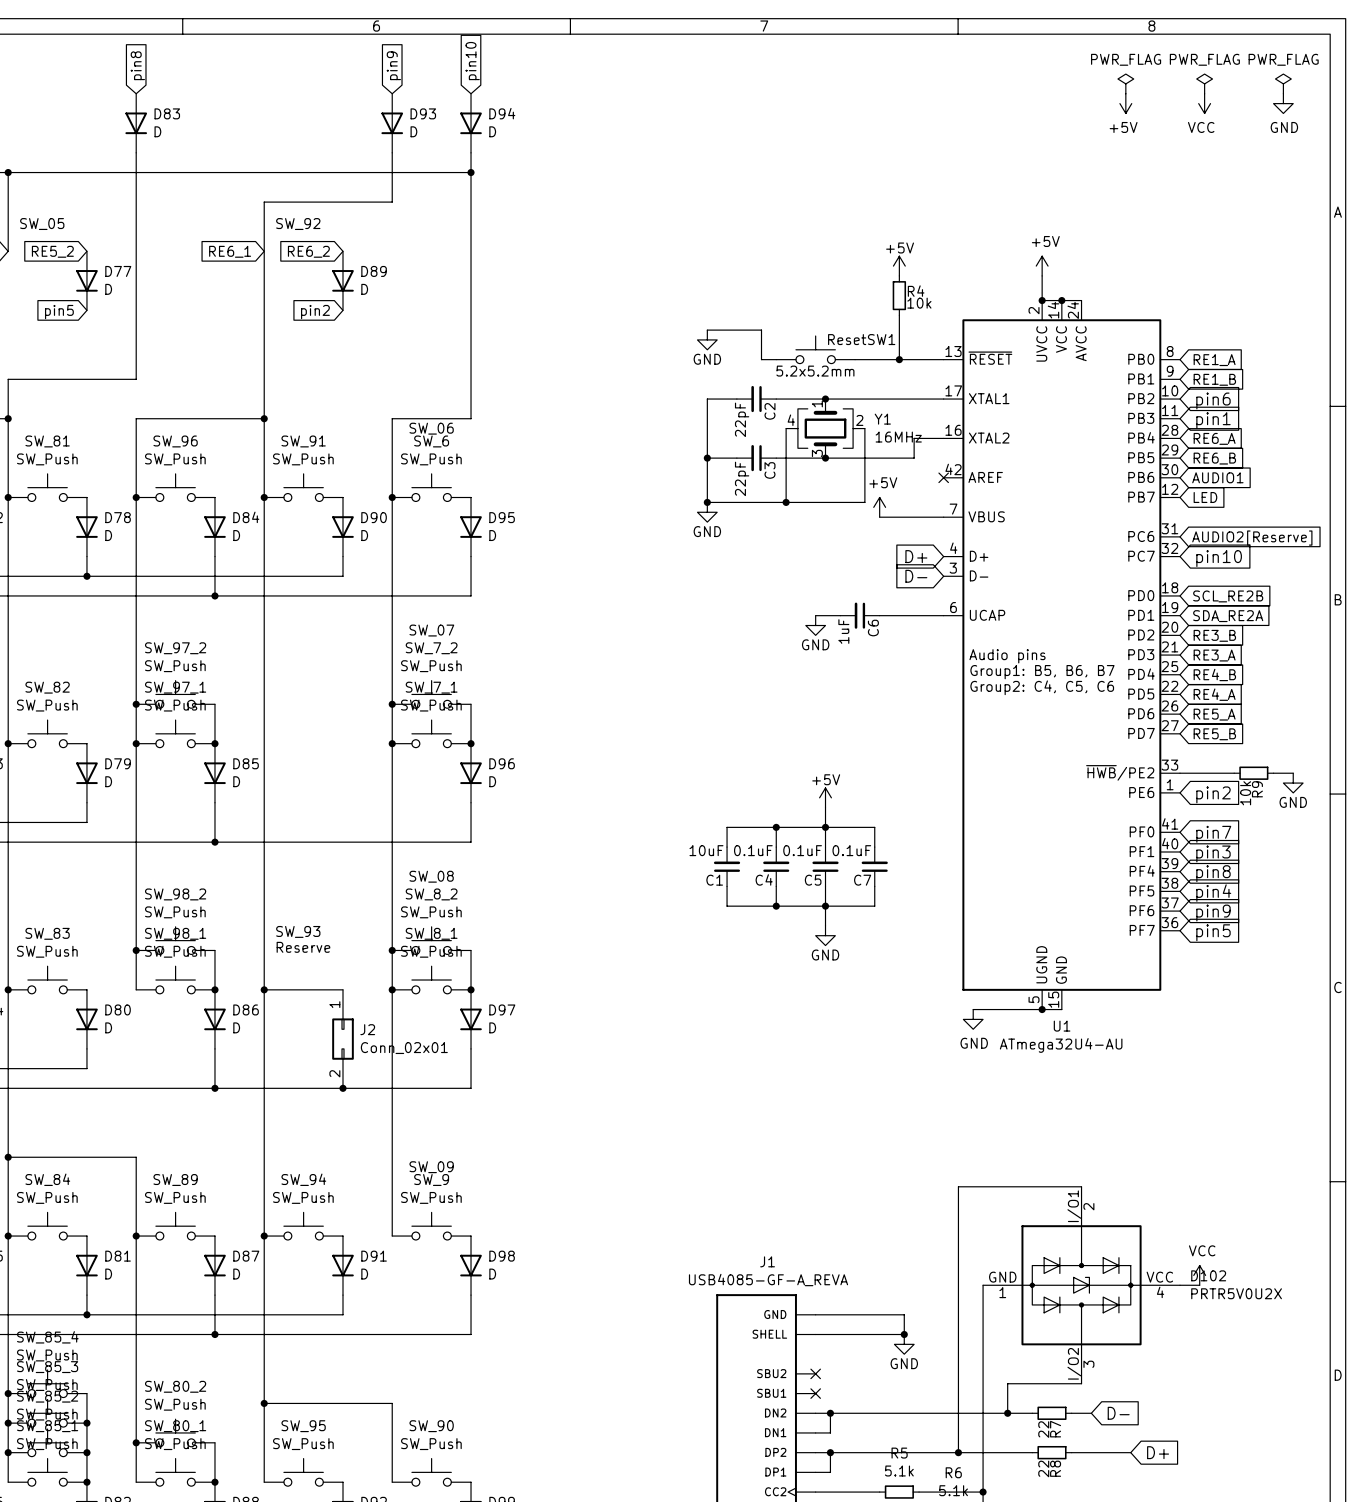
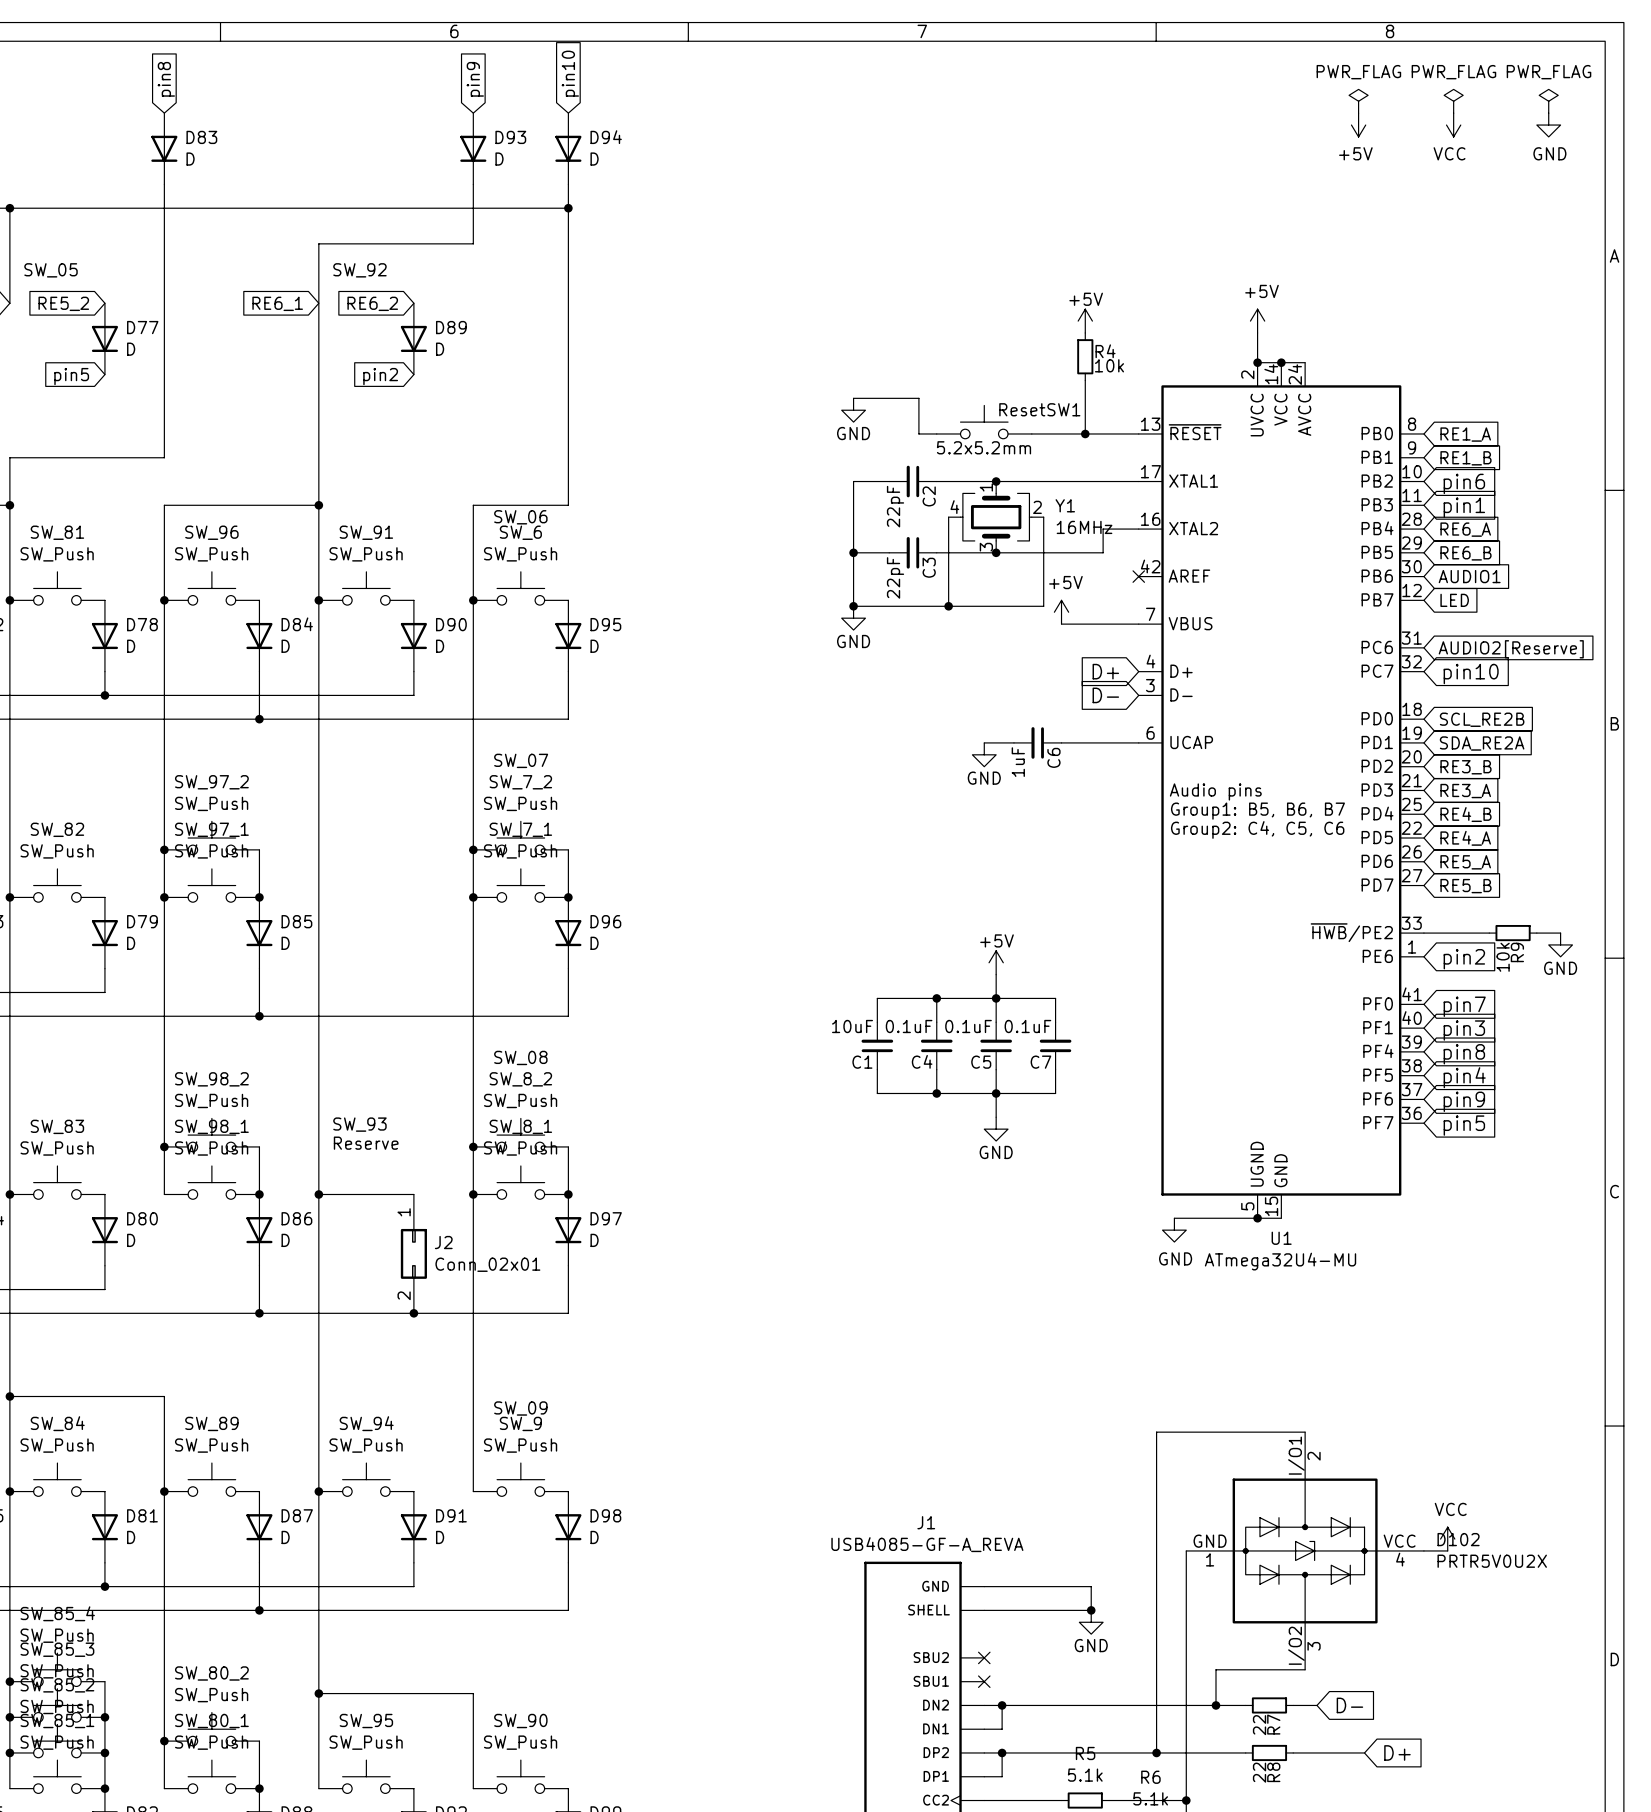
U1 value: ATmega32U4-AU (1061, 1045) -> ATmega32U4-MU (1280, 1261)

